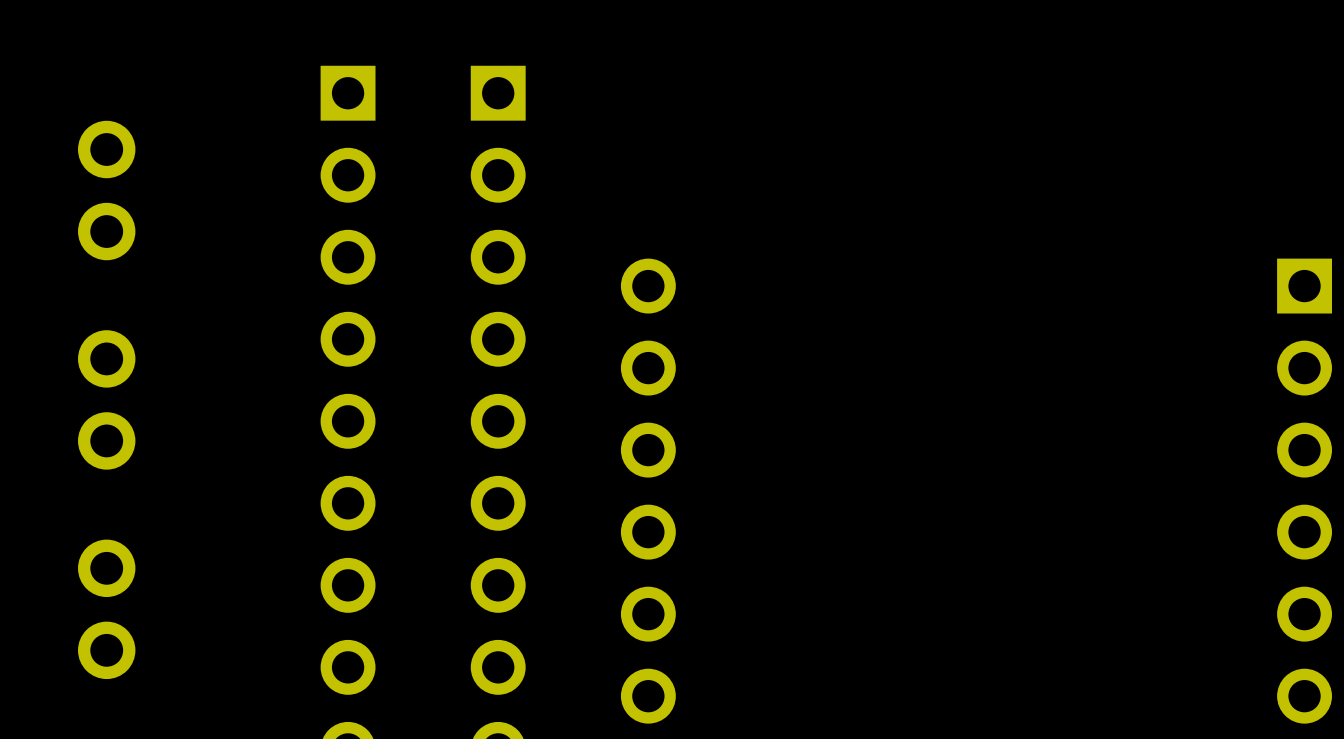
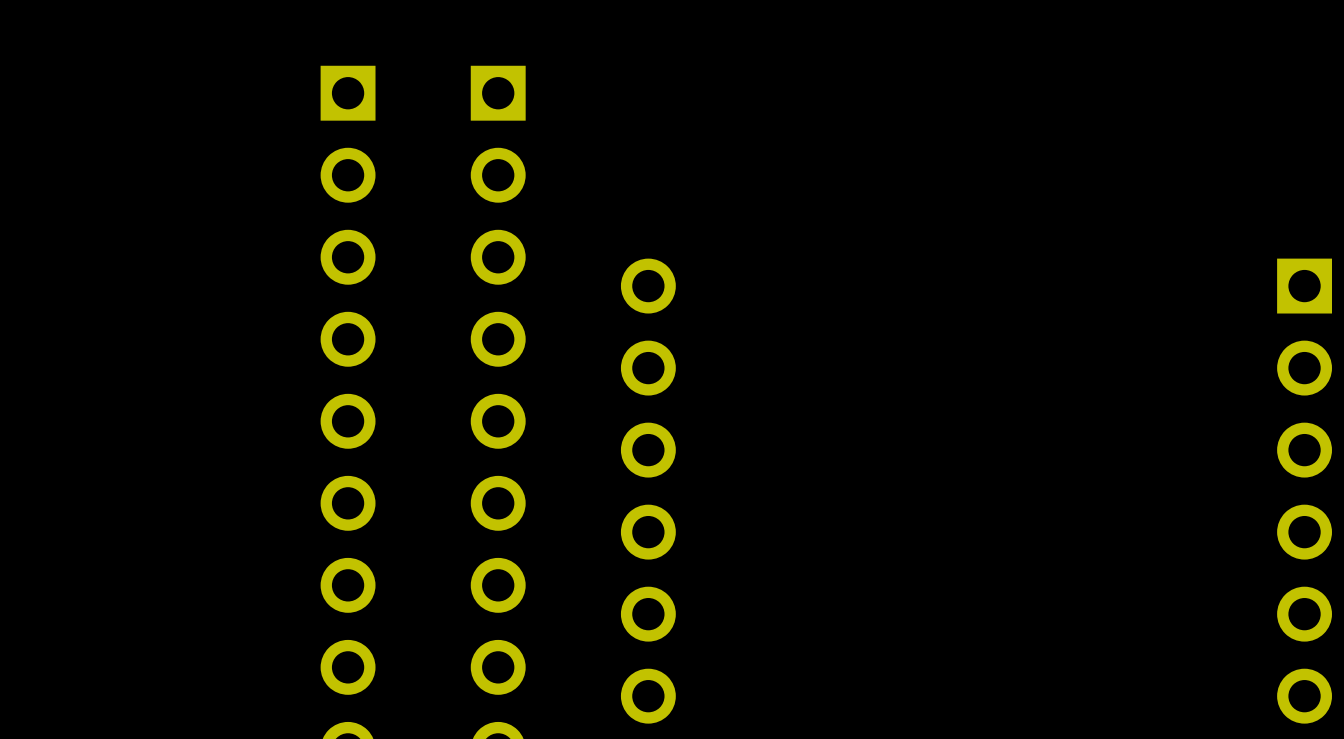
part: (106, 190) -> none
part: (106, 399) -> none
part: (106, 609) -> none

